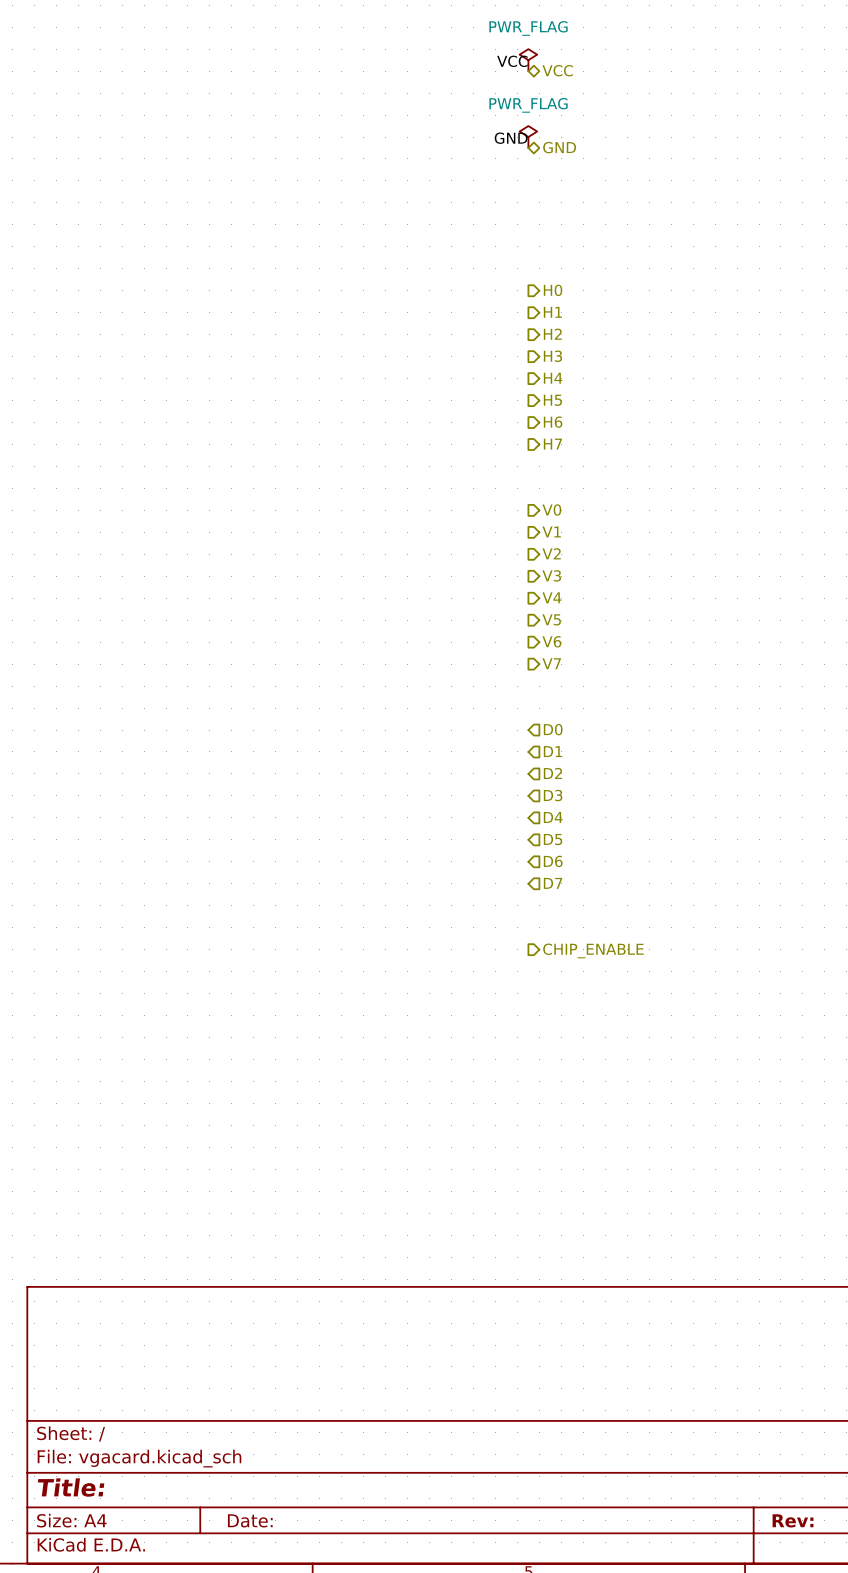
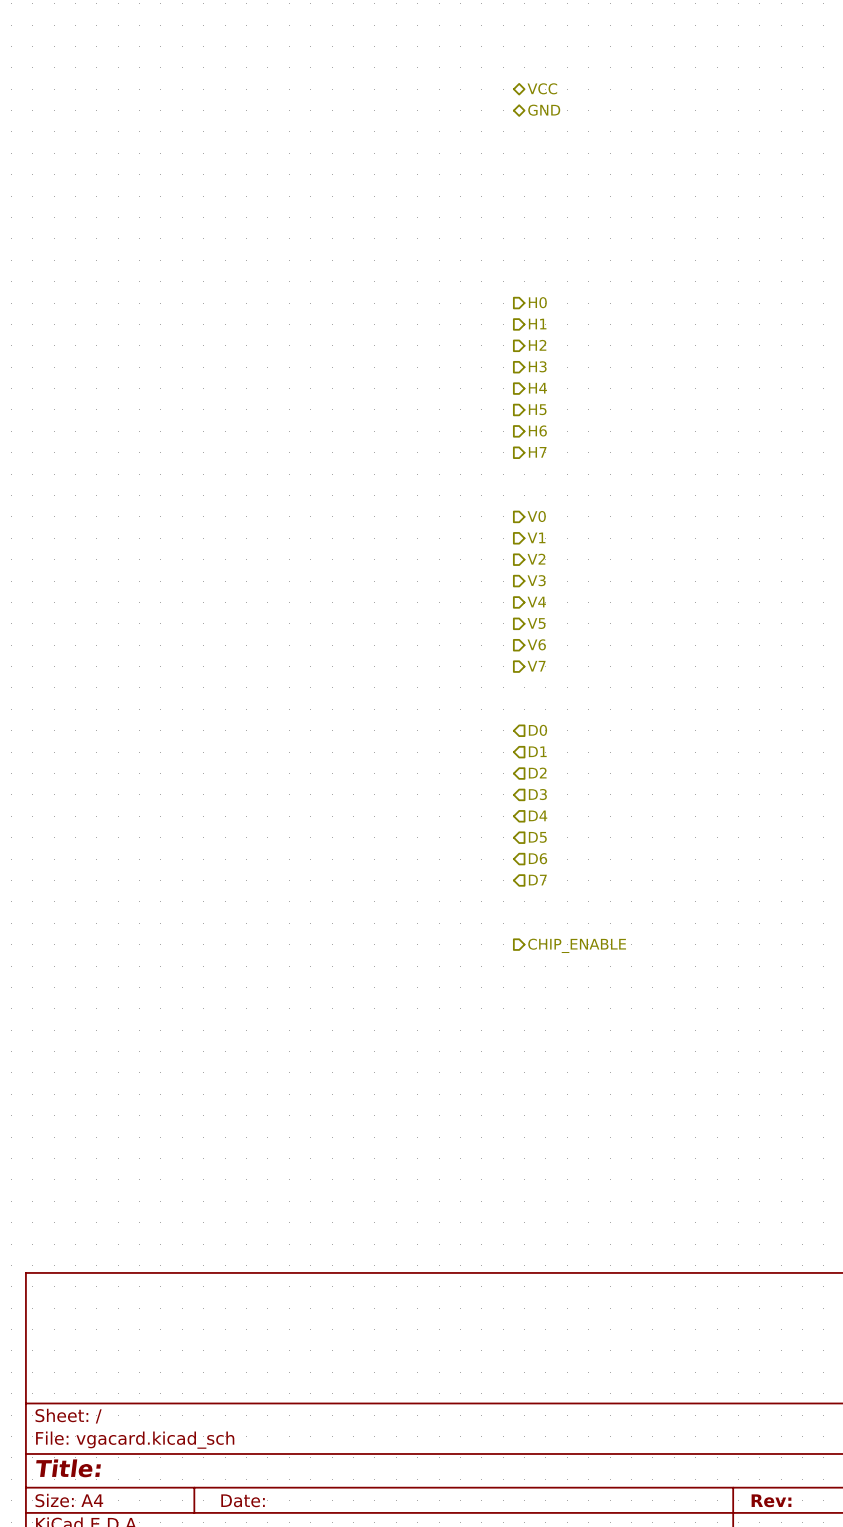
power symbol: PWR_FLAG (528, 60) -> none
label: VCC (512, 61) -> none
power symbol: PWR_FLAG (528, 137) -> none
label: GND (511, 138) -> none
hierarchical label position: GND (559, 147) -> GND (544, 110)

